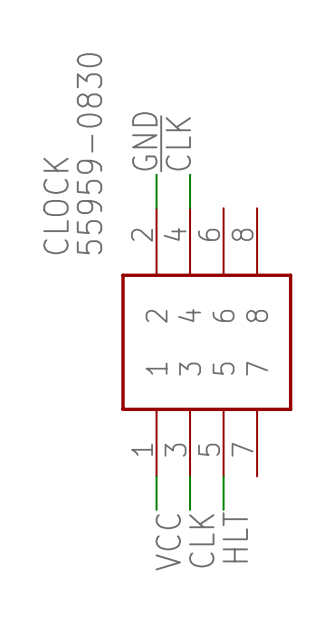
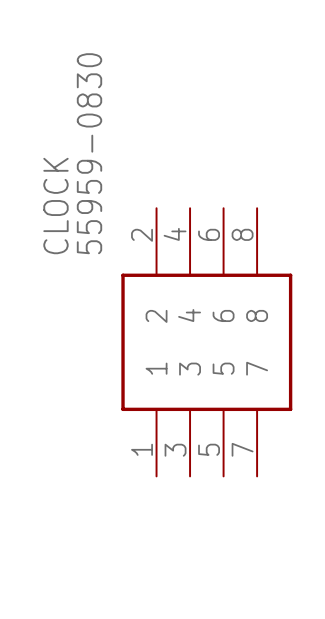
label: GND (144, 141) -> none
label: ~{CLK} (175, 143) -> none
wire: (156, 174) (156, 208) -> none
wire: (190, 174) (190, 208) -> none
wire: (156, 476) (156, 509) -> none
wire: (190, 476) (190, 509) -> none
wire: (223, 476) (223, 509) -> none
label: HLT (235, 537) -> none
label: CLK (201, 540) -> none
label: VCC (168, 542) -> none

